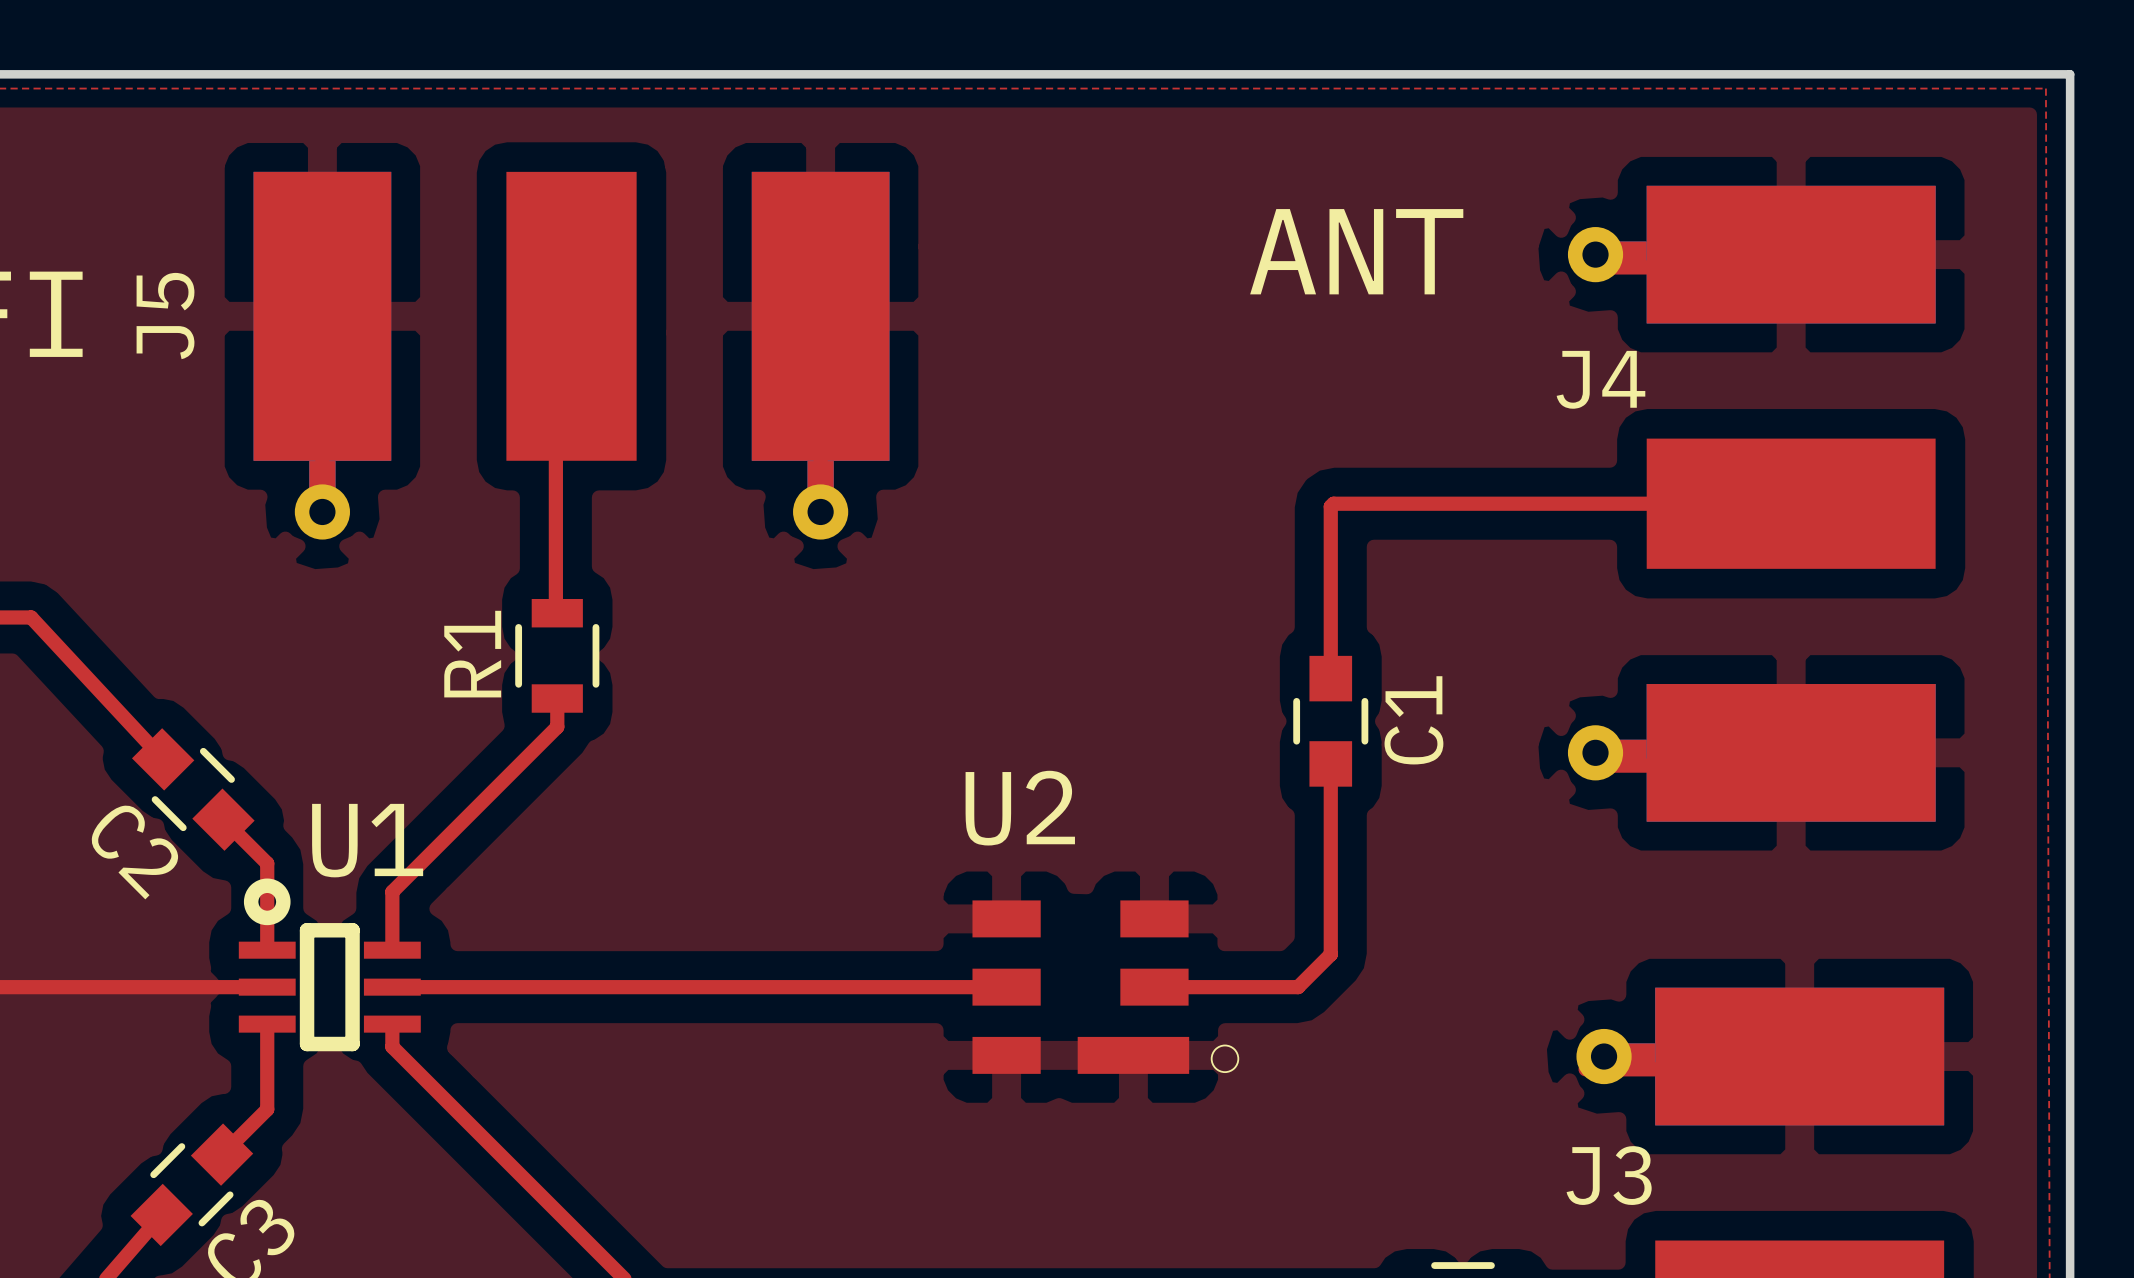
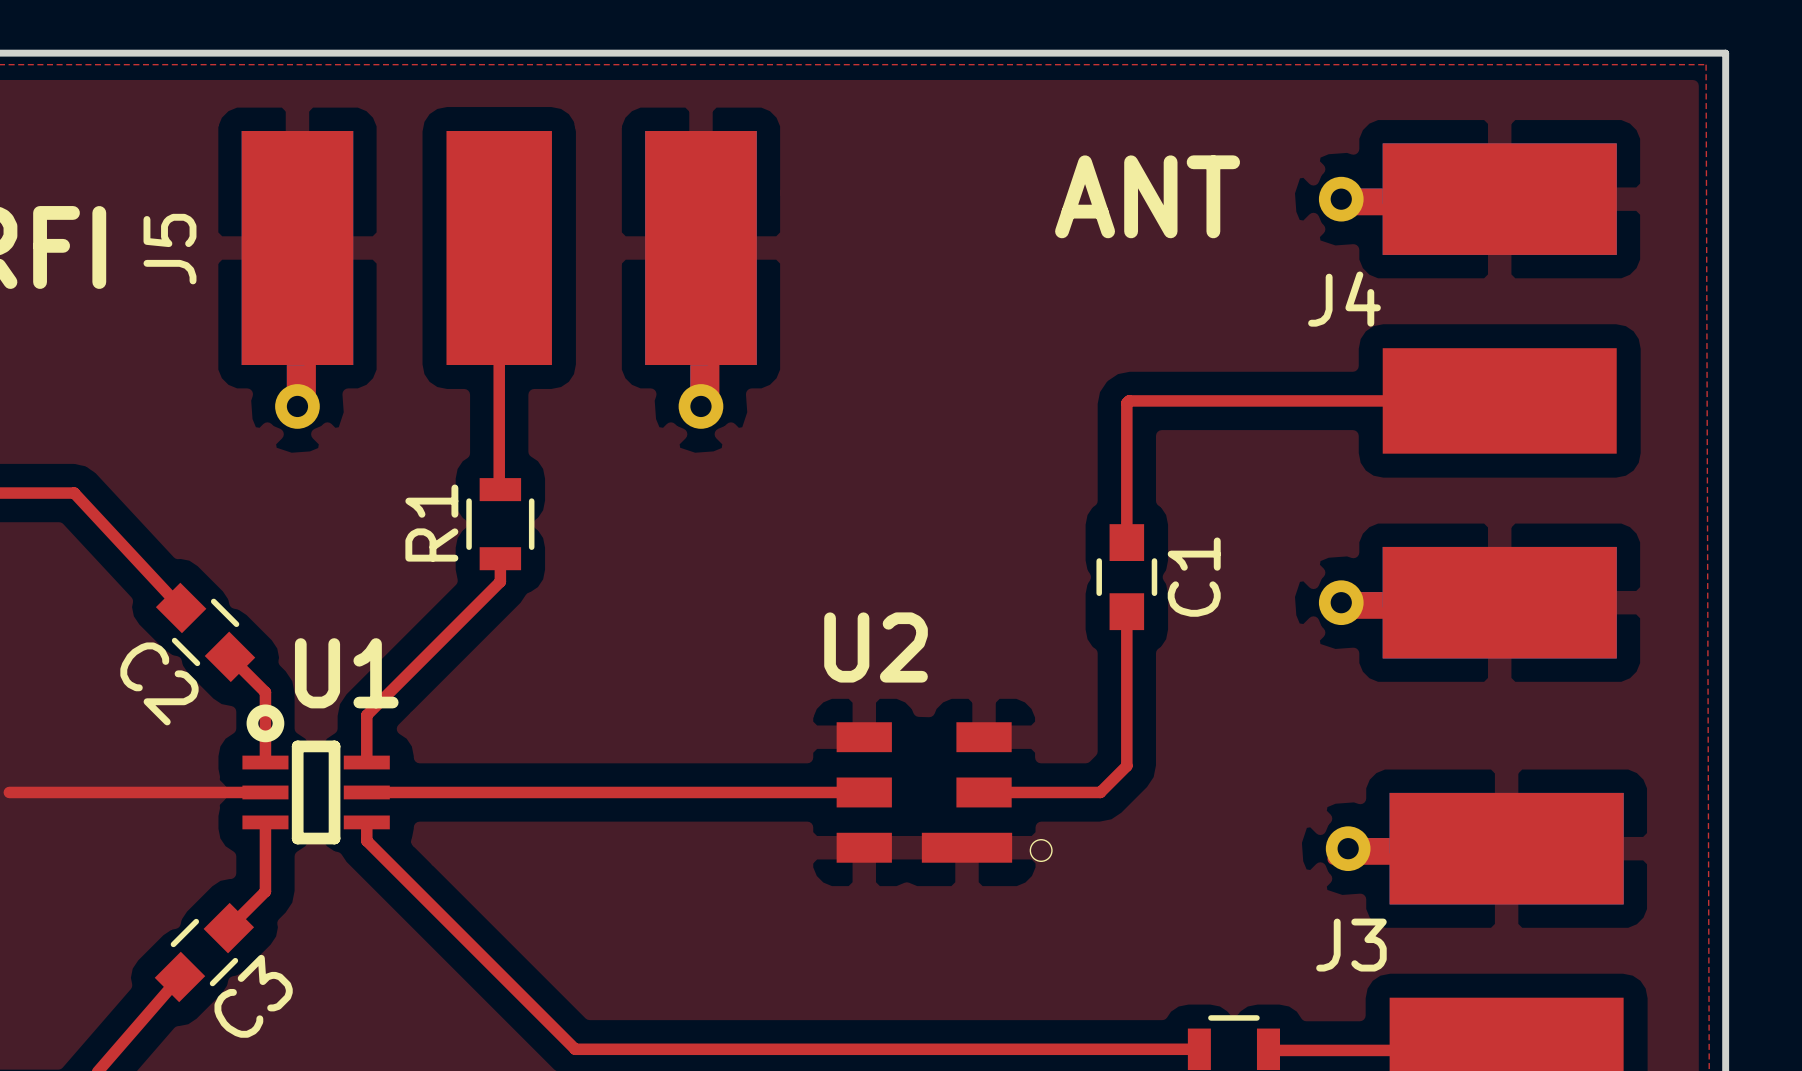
J5 position: (571, 355) -> (499, 279)

